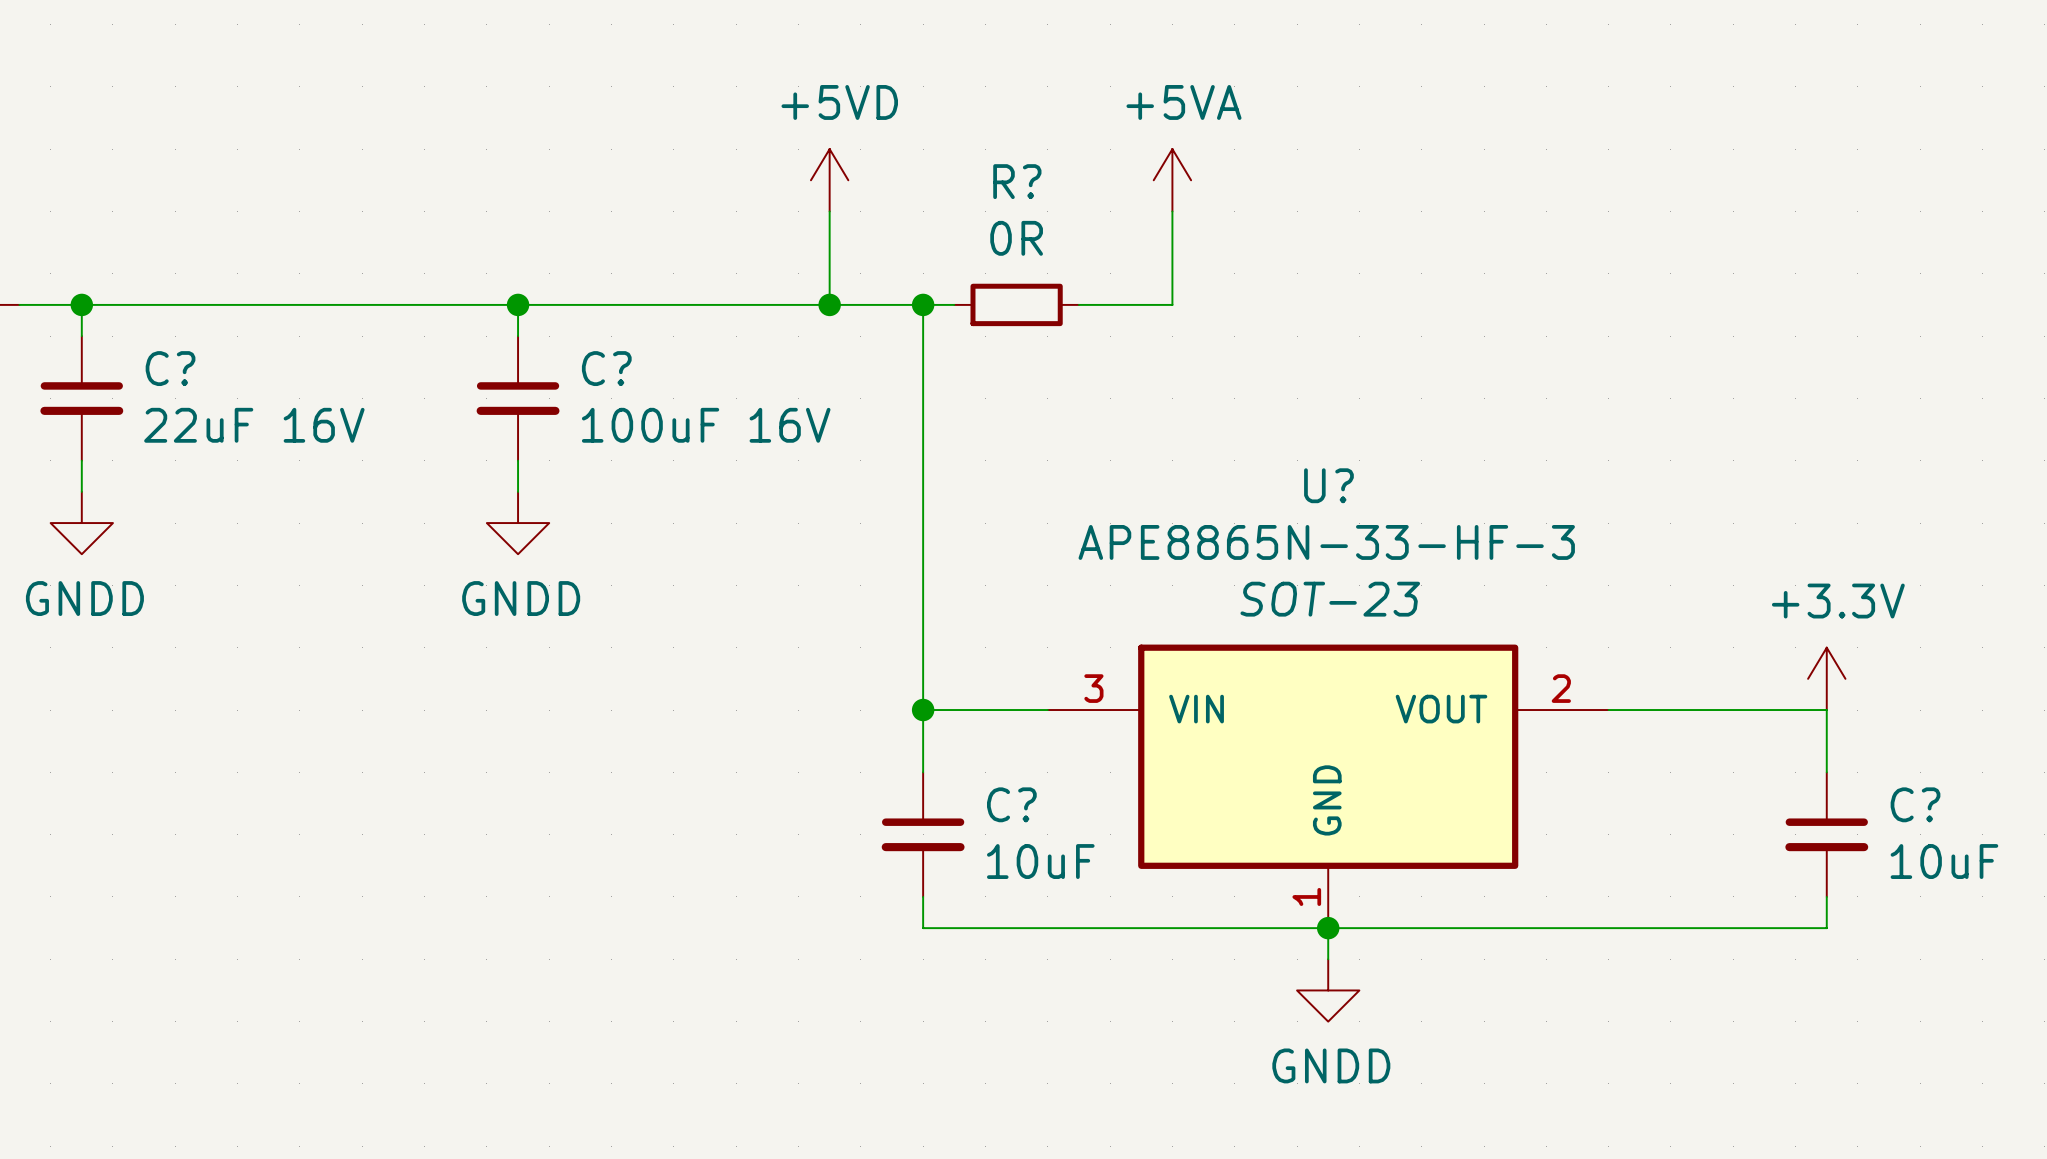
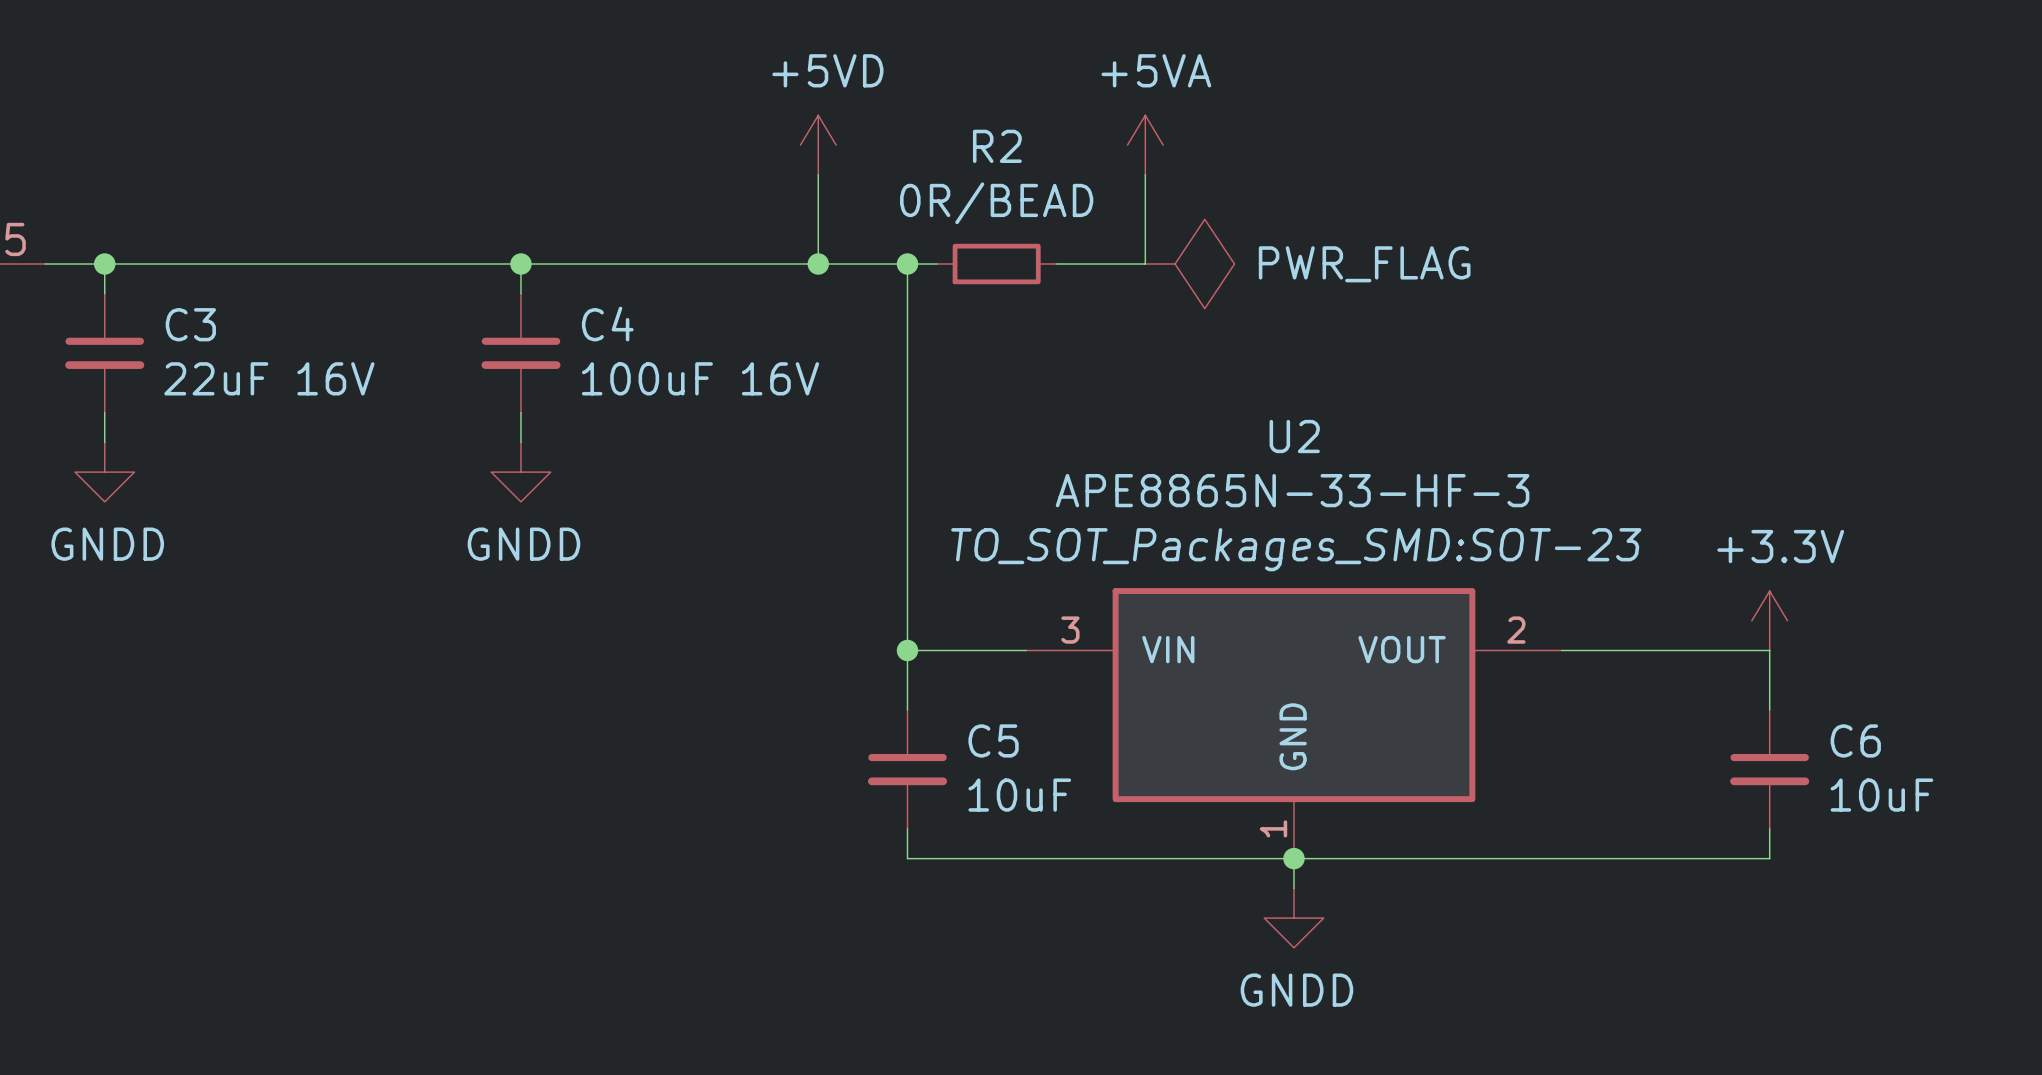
R? name: R? (1017, 181) -> R2 (997, 146)
R? value: 0R (1016, 238) -> 0R/BEAD (996, 203)
power symbol: none -> PWR_FLAG (1189, 264)
C? name: C? (170, 368) -> C3 (190, 324)
C? name: C? (606, 368) -> C4 (607, 324)
U? name: U? (1328, 485) -> U2 (1294, 436)
U? text: SOT-23 (1330, 599) -> TO_SOT_Packages_SMD:SOT-23 (1296, 549)
C? name: C? (1011, 804) -> C5 (993, 740)
C? name: C? (1915, 804) -> C6 (1855, 740)

